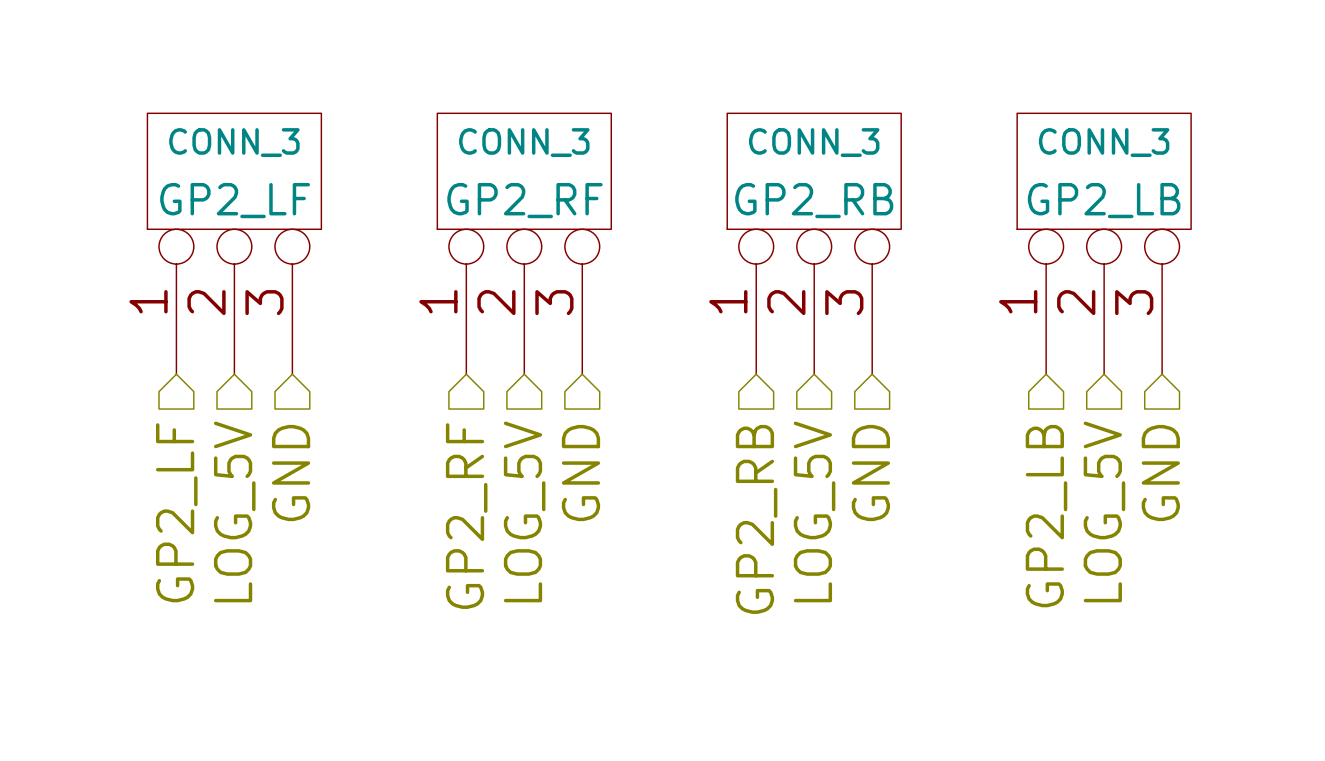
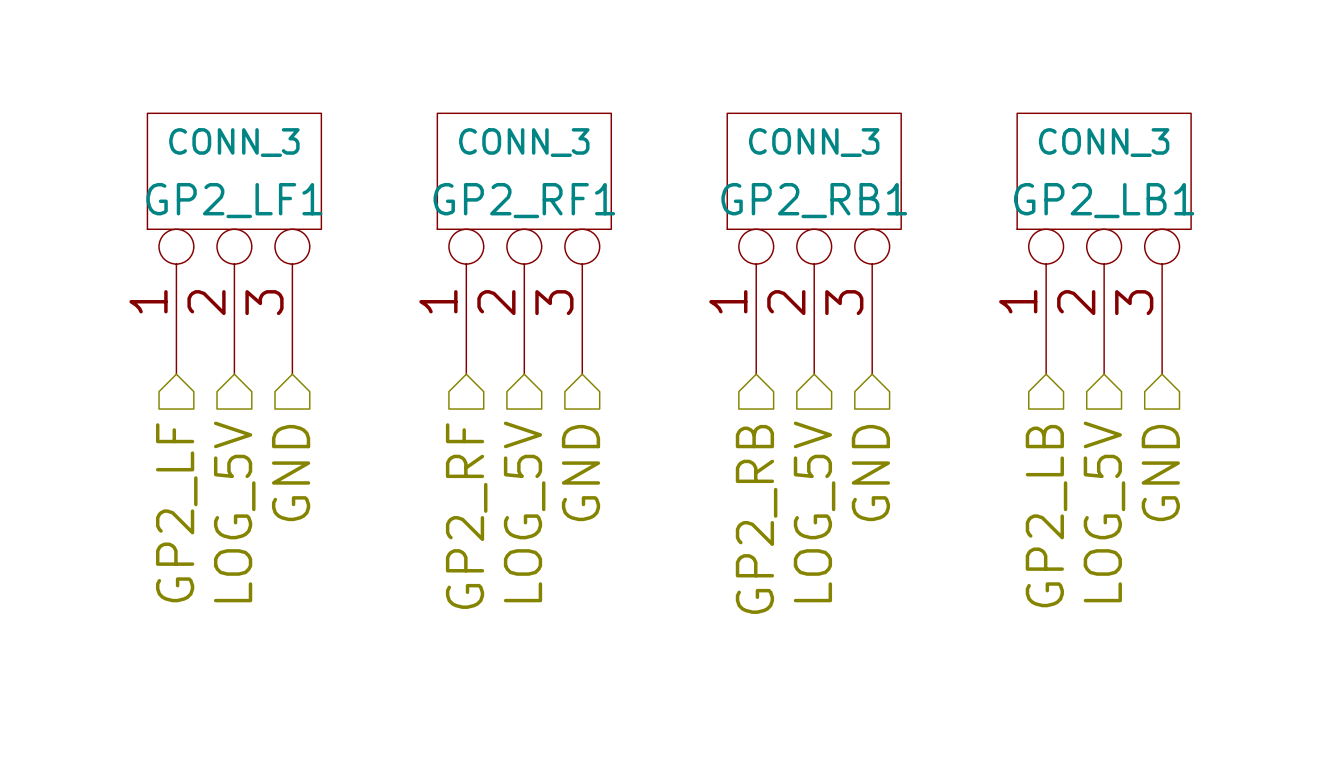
GP2_LF name: GP2_LF (235, 200) -> GP2_LF1 (234, 200)
GP2_RF name: GP2_RF (524, 200) -> GP2_RF1 (524, 200)
GP2_RB name: GP2_RB (814, 200) -> GP2_RB1 (814, 200)
GP2_LB name: GP2_LB (1104, 200) -> GP2_LB1 (1104, 200)

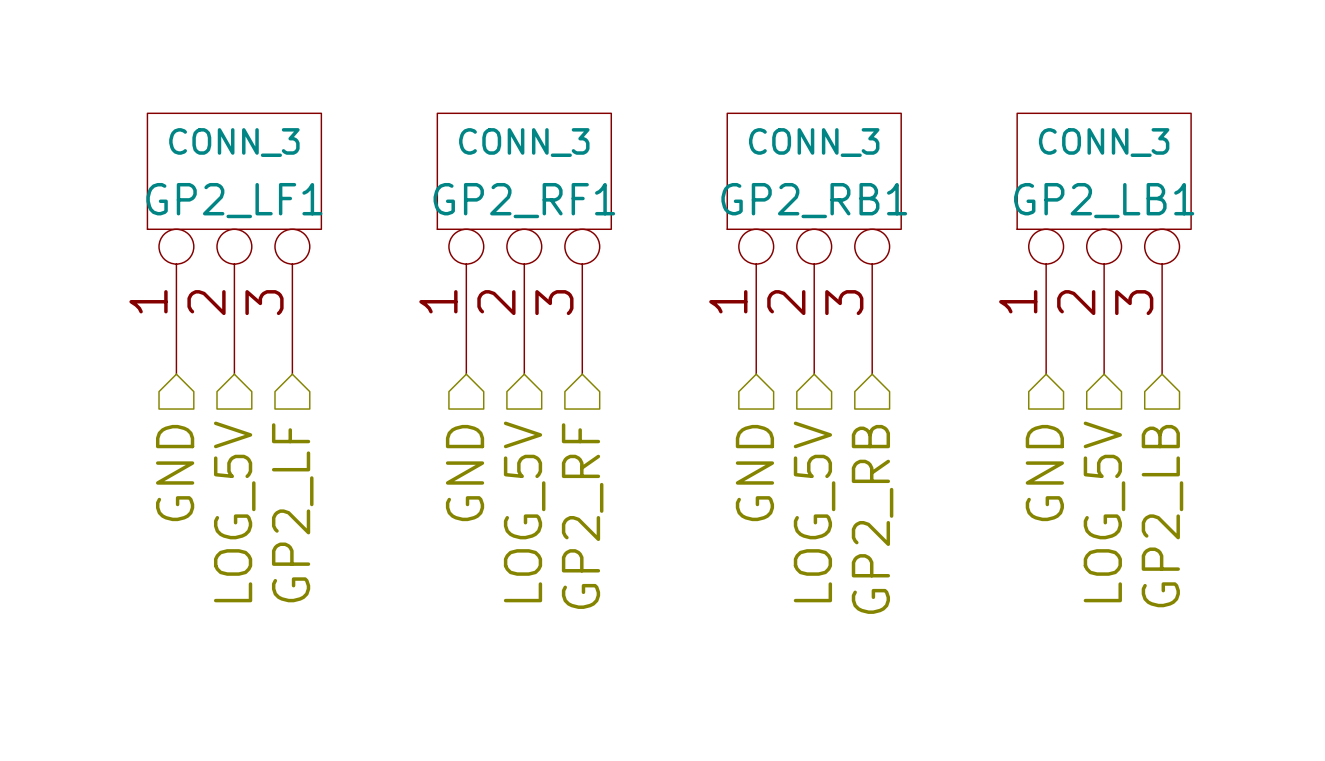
hierarchical label: GND (291, 473) -> GP2_LF (292, 512)
hierarchical label: GND (580, 473) -> GP2_RF (582, 516)
hierarchical label: GND (870, 473) -> GP2_RB (872, 519)
hierarchical label: GND (1160, 473) -> GP2_LB (1162, 516)
hierarchical label: GP2_LF (176, 512) -> GND (175, 473)
hierarchical label: GP2_RF (466, 516) -> GND (465, 473)
hierarchical label: GP2_LB (1046, 516) -> GND (1044, 473)
hierarchical label: GP2_RB (756, 519) -> GND (754, 473)

